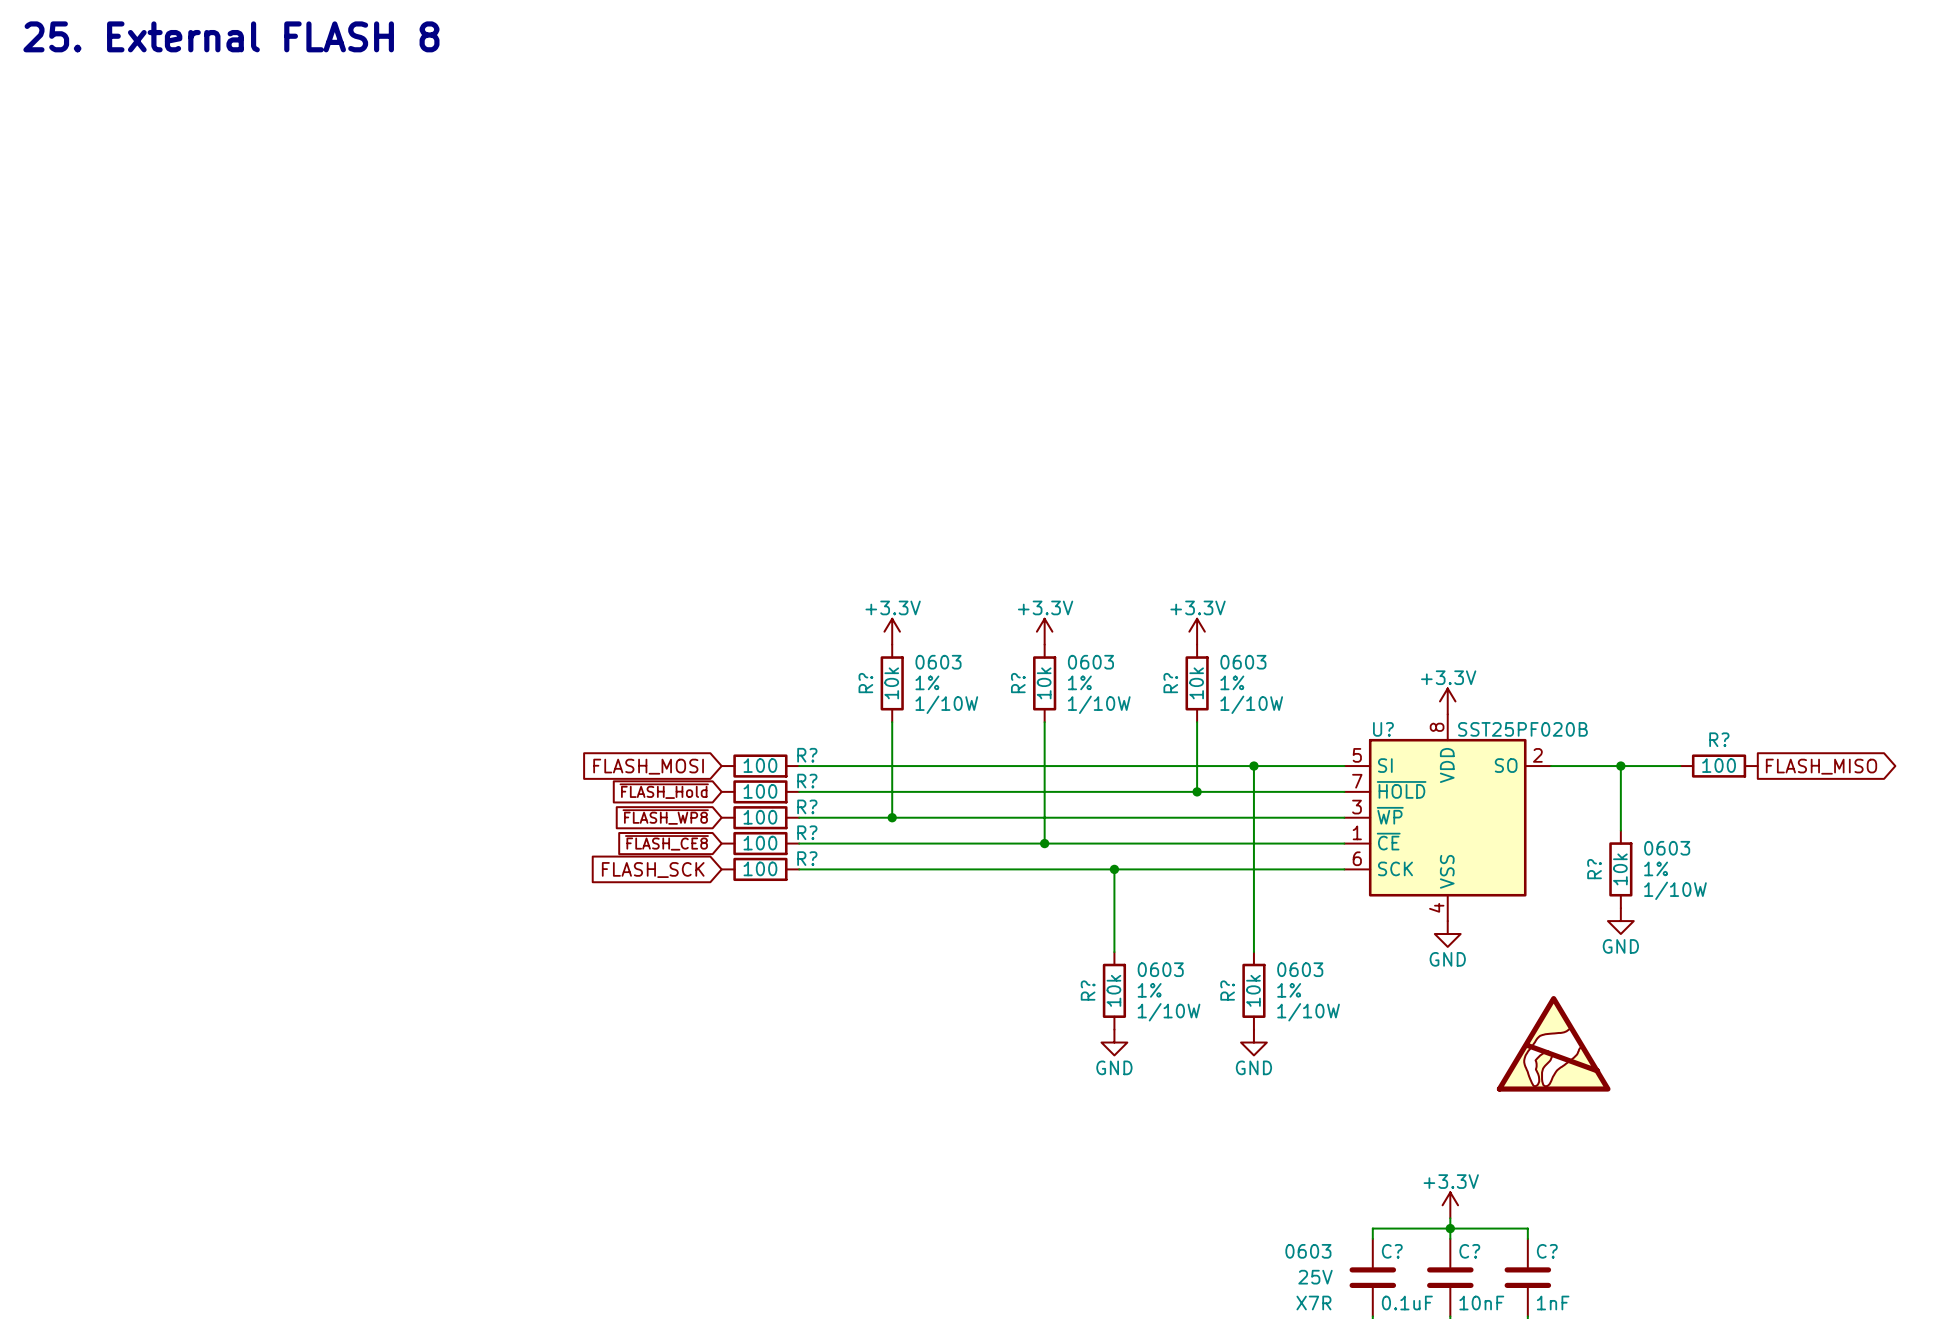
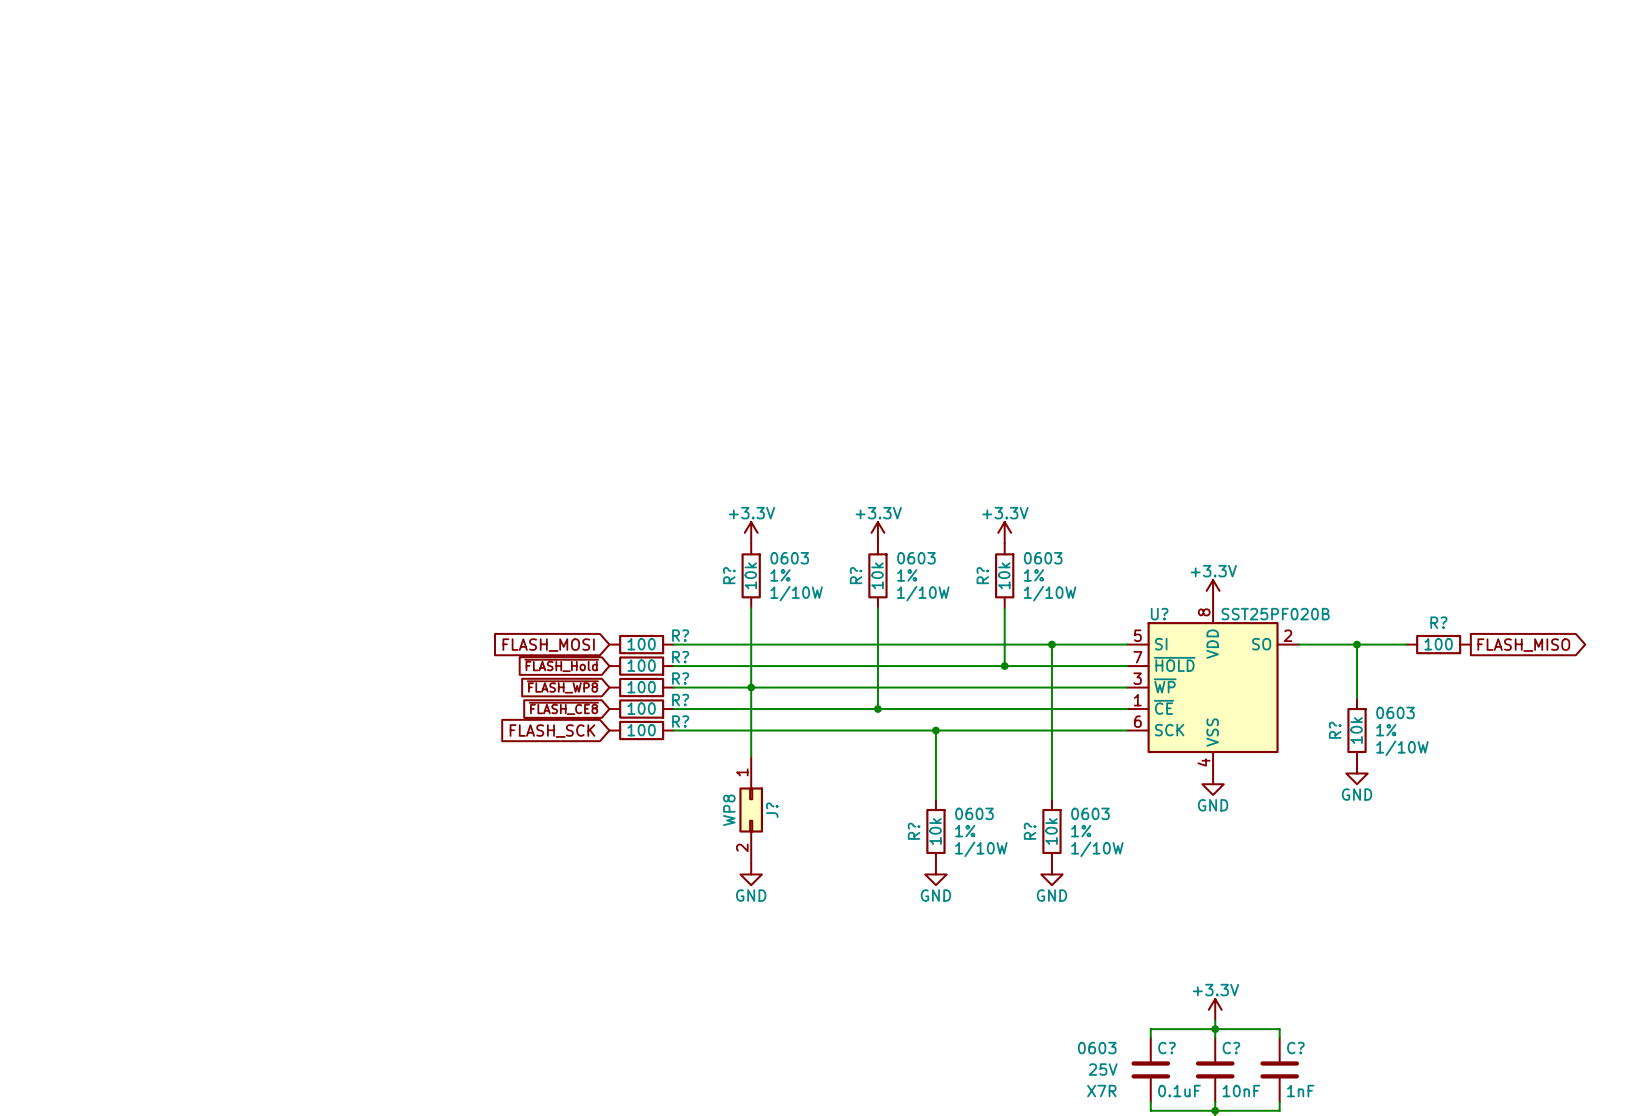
text: 25. External FLASH 8 (231, 36) -> none
wire: none -> (751, 687) (751, 756)
J?: none -> WP8 (751, 810)
power symbol: none -> GND (751, 874)
power symbol: (1553, 1043) -> none

